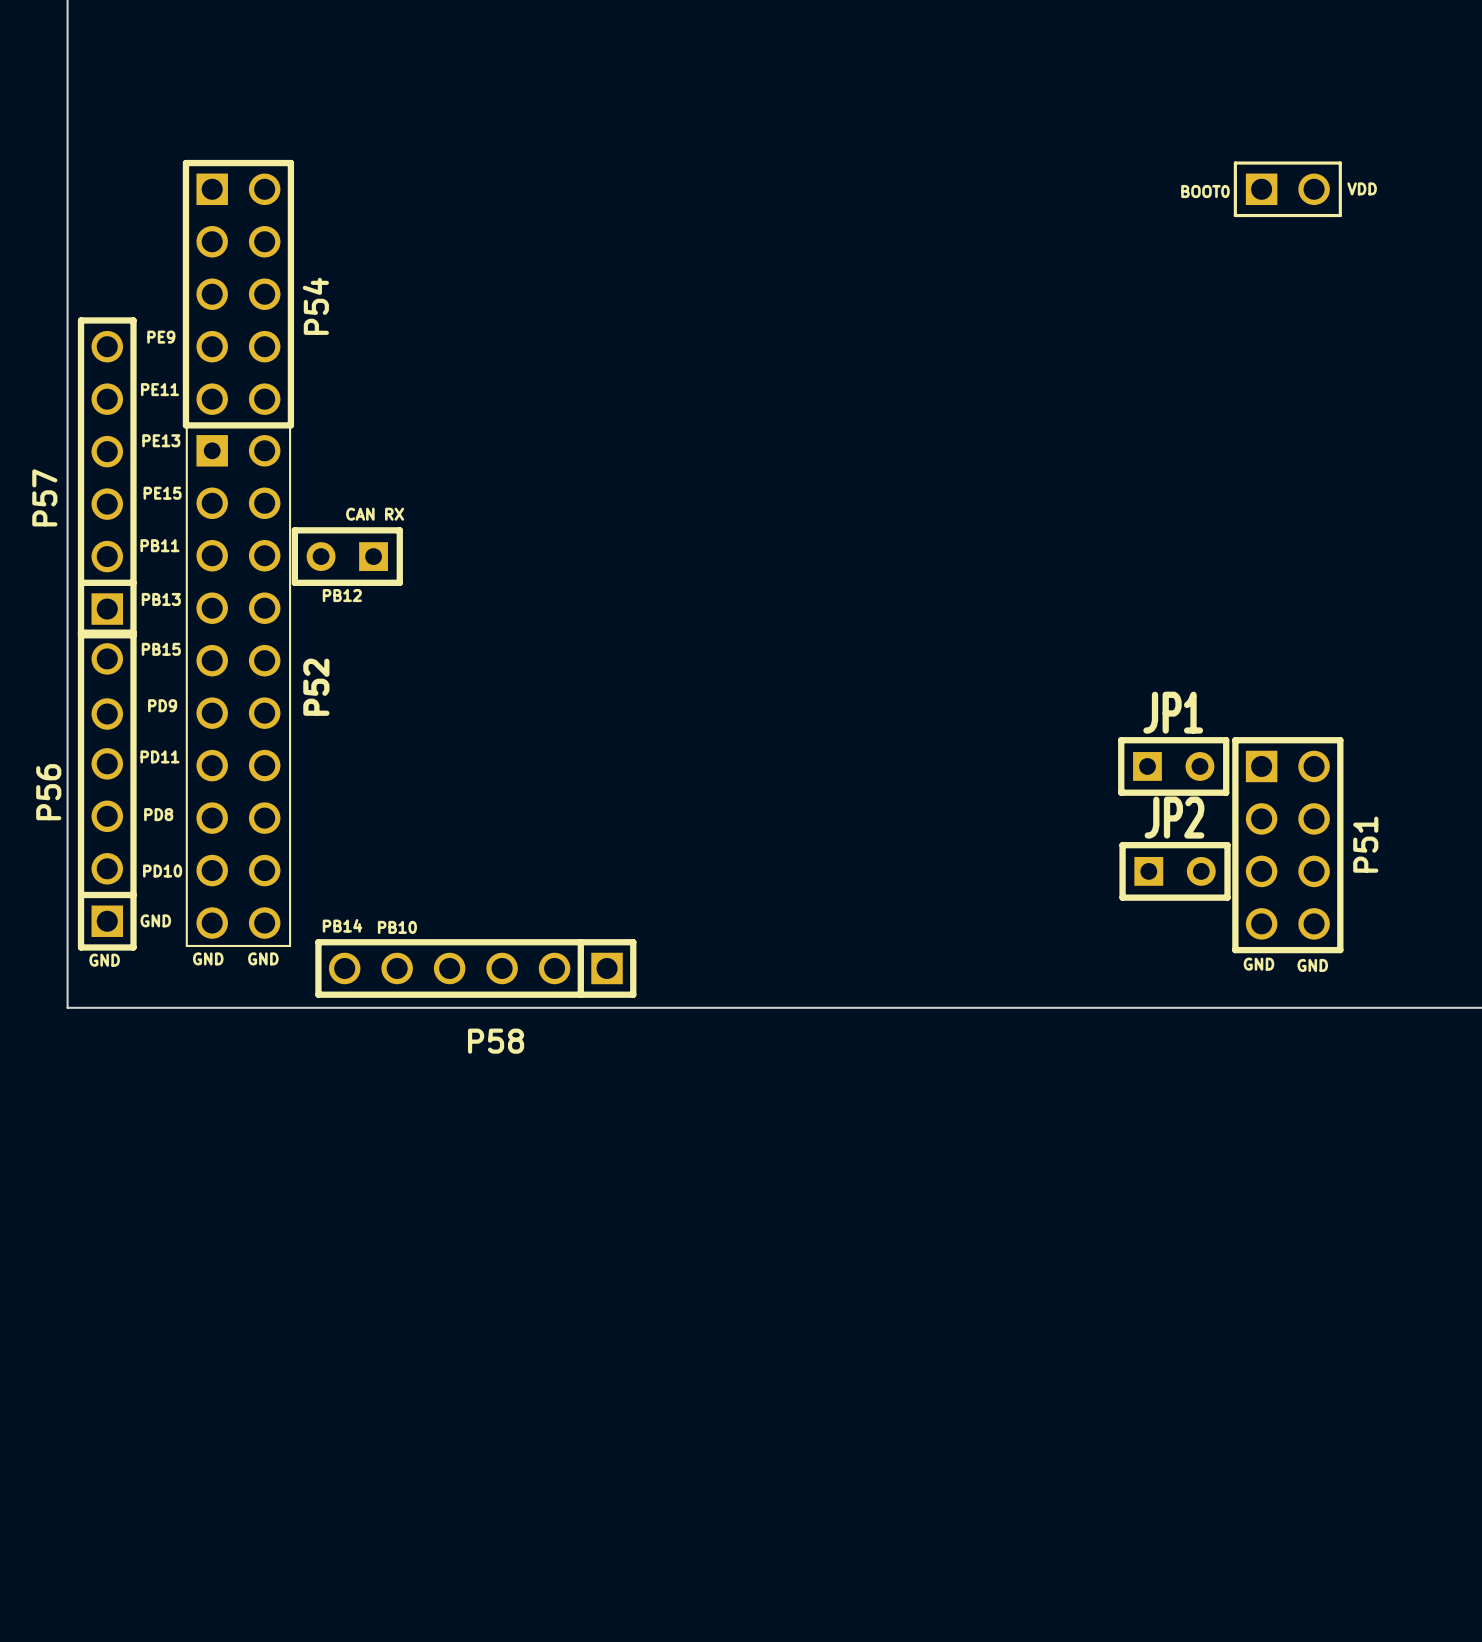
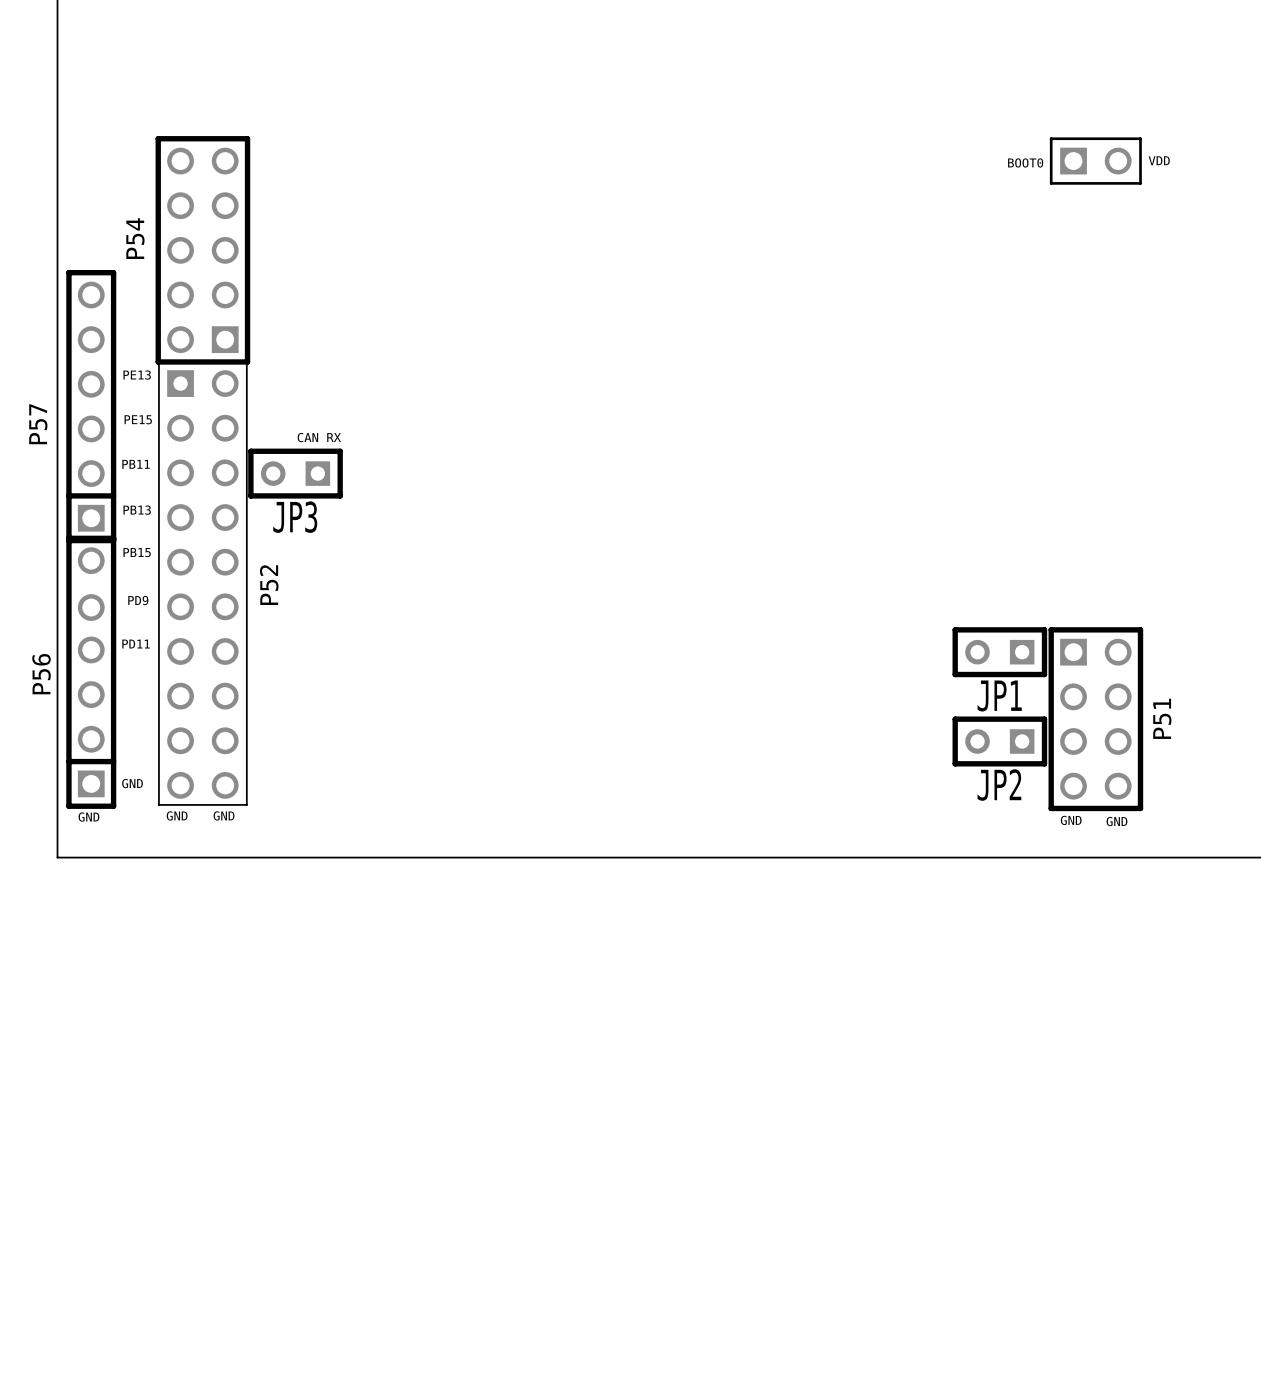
P54 rotation: 0° (238, 294) -> 180° (202, 250)
text: PE9 (161, 337) -> none
text: PE11 (159, 389) -> none
text: PB12 (342, 595) -> none
JP3 name: none -> JP3 (295, 517)
JP1 rotation: 0° (1173, 766) -> 180° (999, 652)
text: PD8 (158, 814) -> none
text: PD10 (162, 871) -> none
JP2 rotation: 0° (1175, 871) -> 180° (999, 741)
text: PB14 (342, 925) -> none
text: PB10 (397, 927) -> none
P58: (475, 968) -> none

